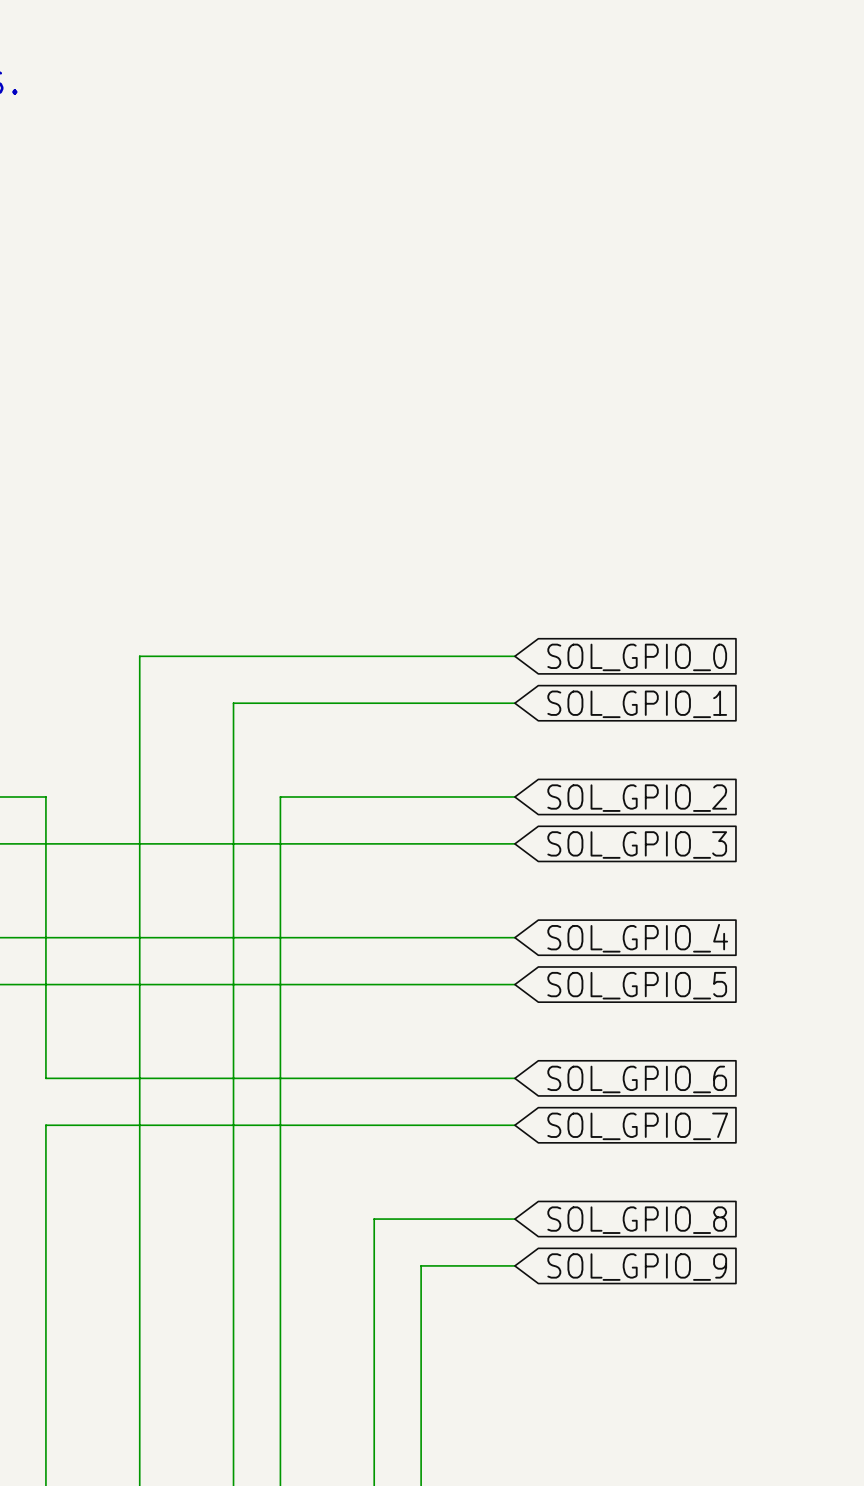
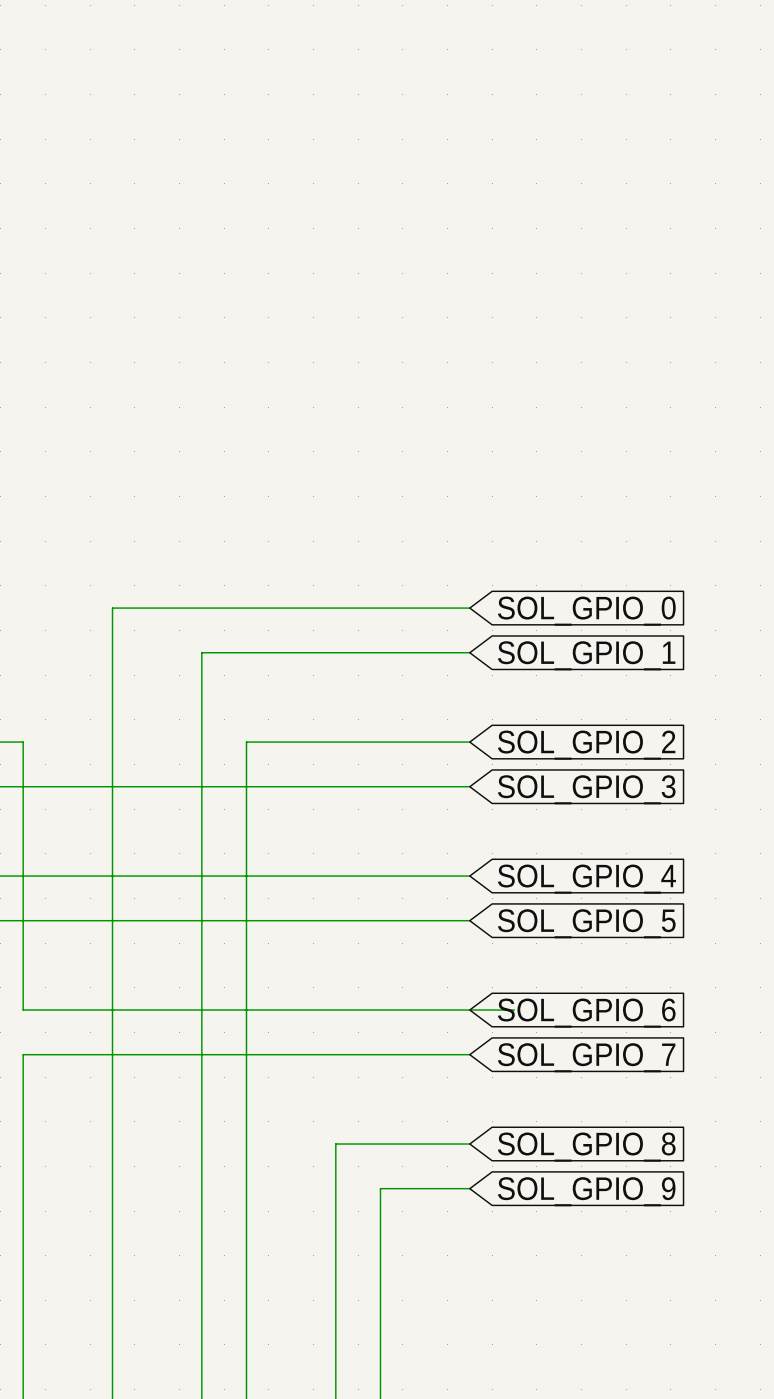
wire: none -> (469, 1010) (514, 1010)

